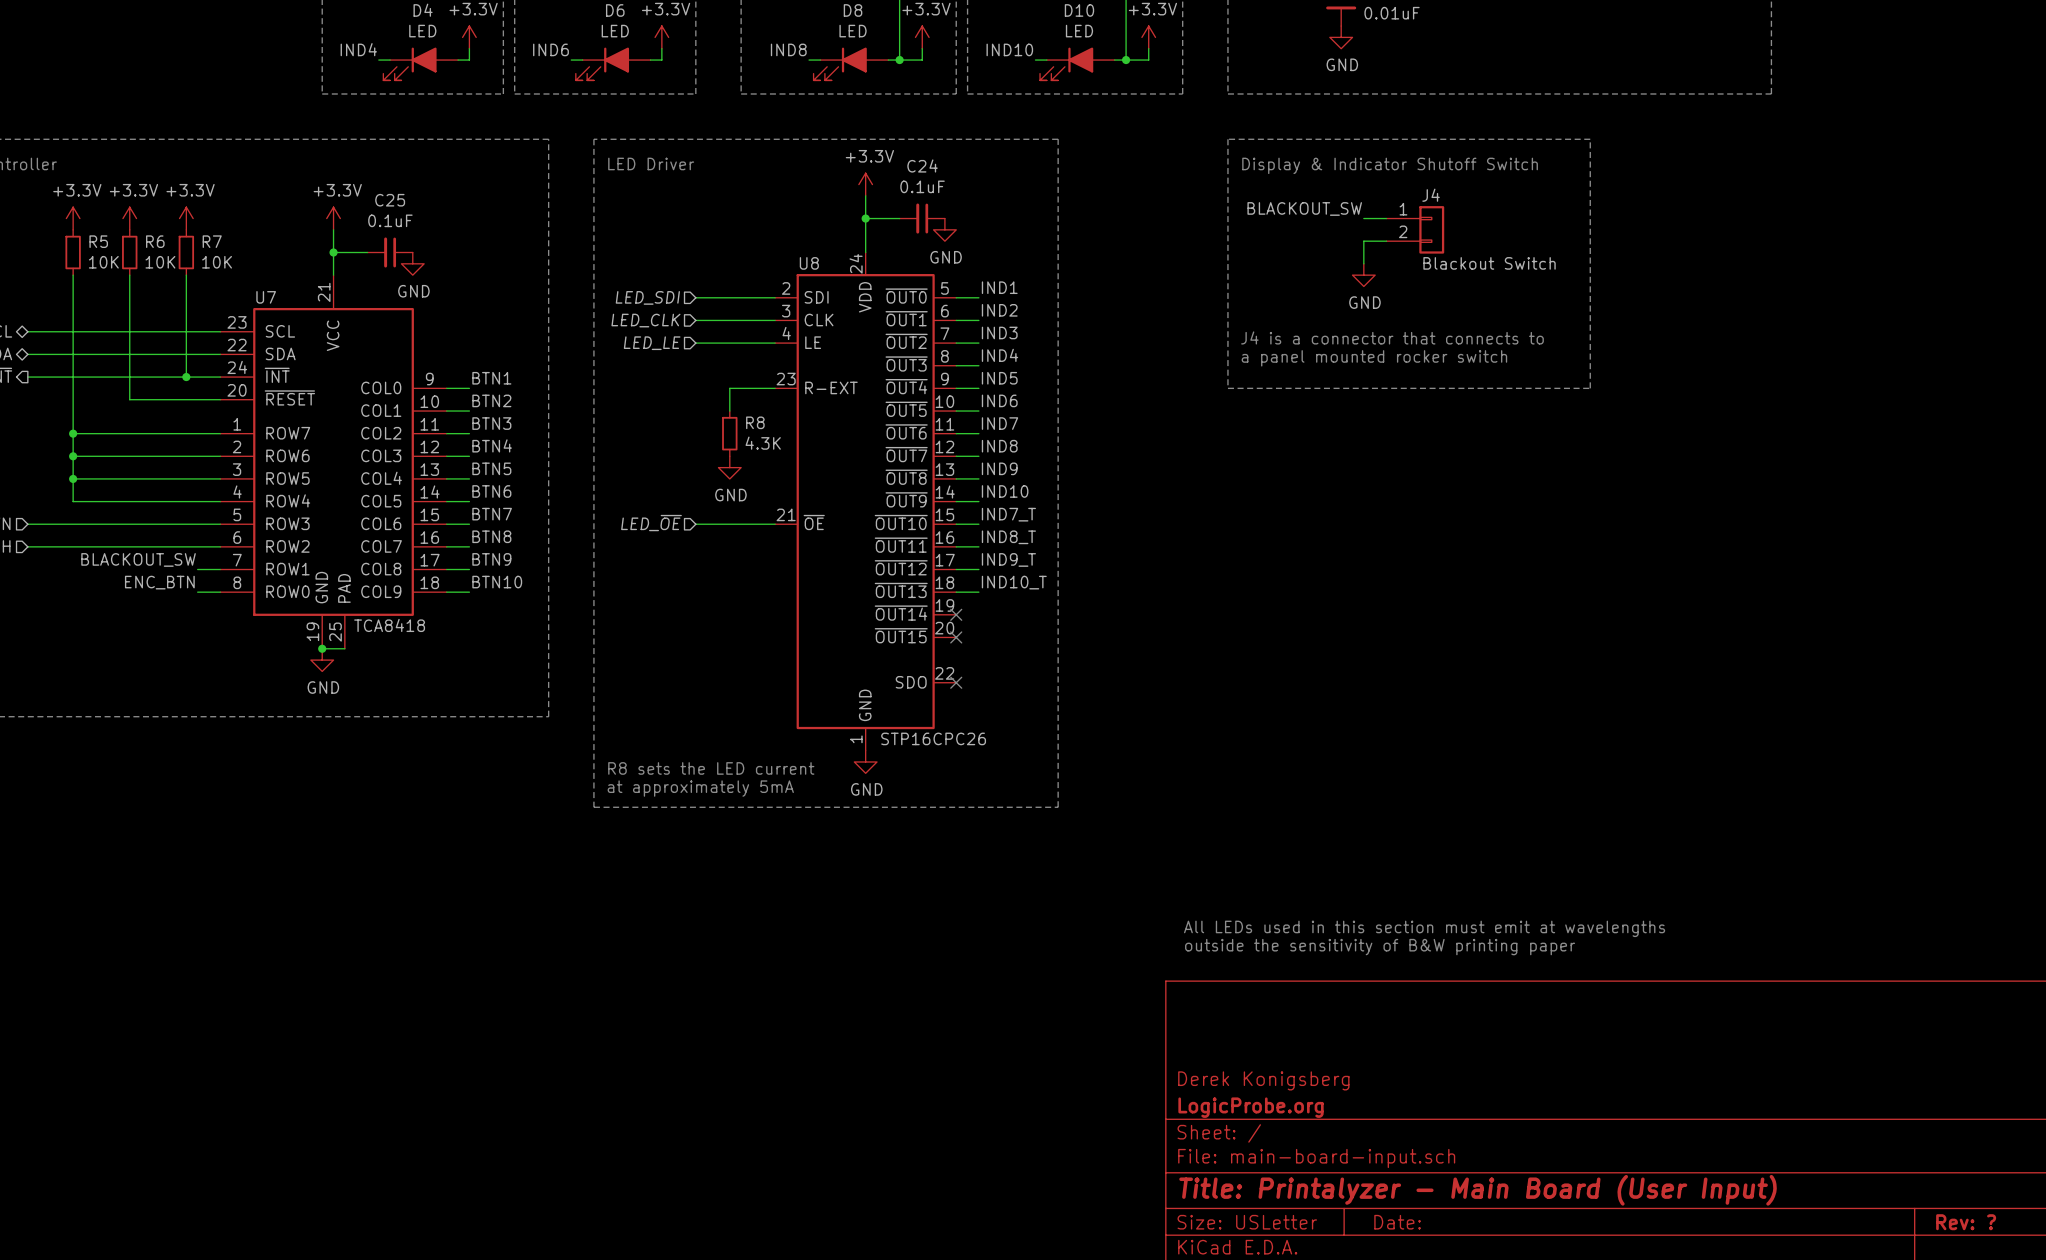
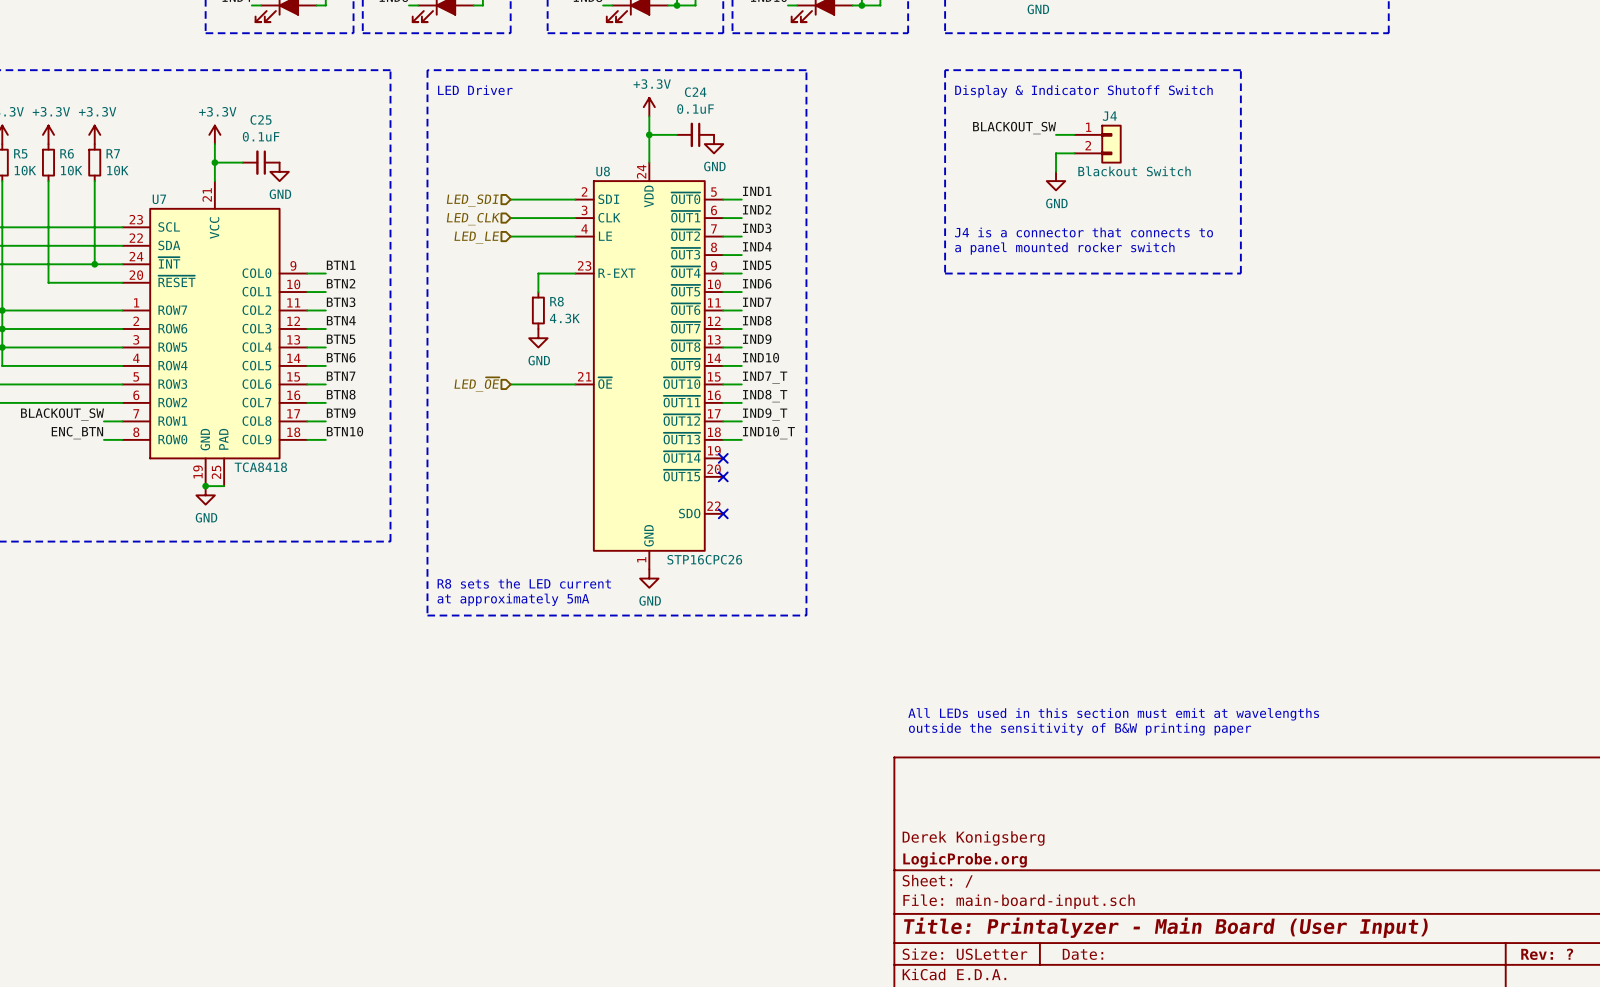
J4 text: none -> Blackout Switch (1134, 171)
J4 value: Blackout Switch (1489, 263) -> none

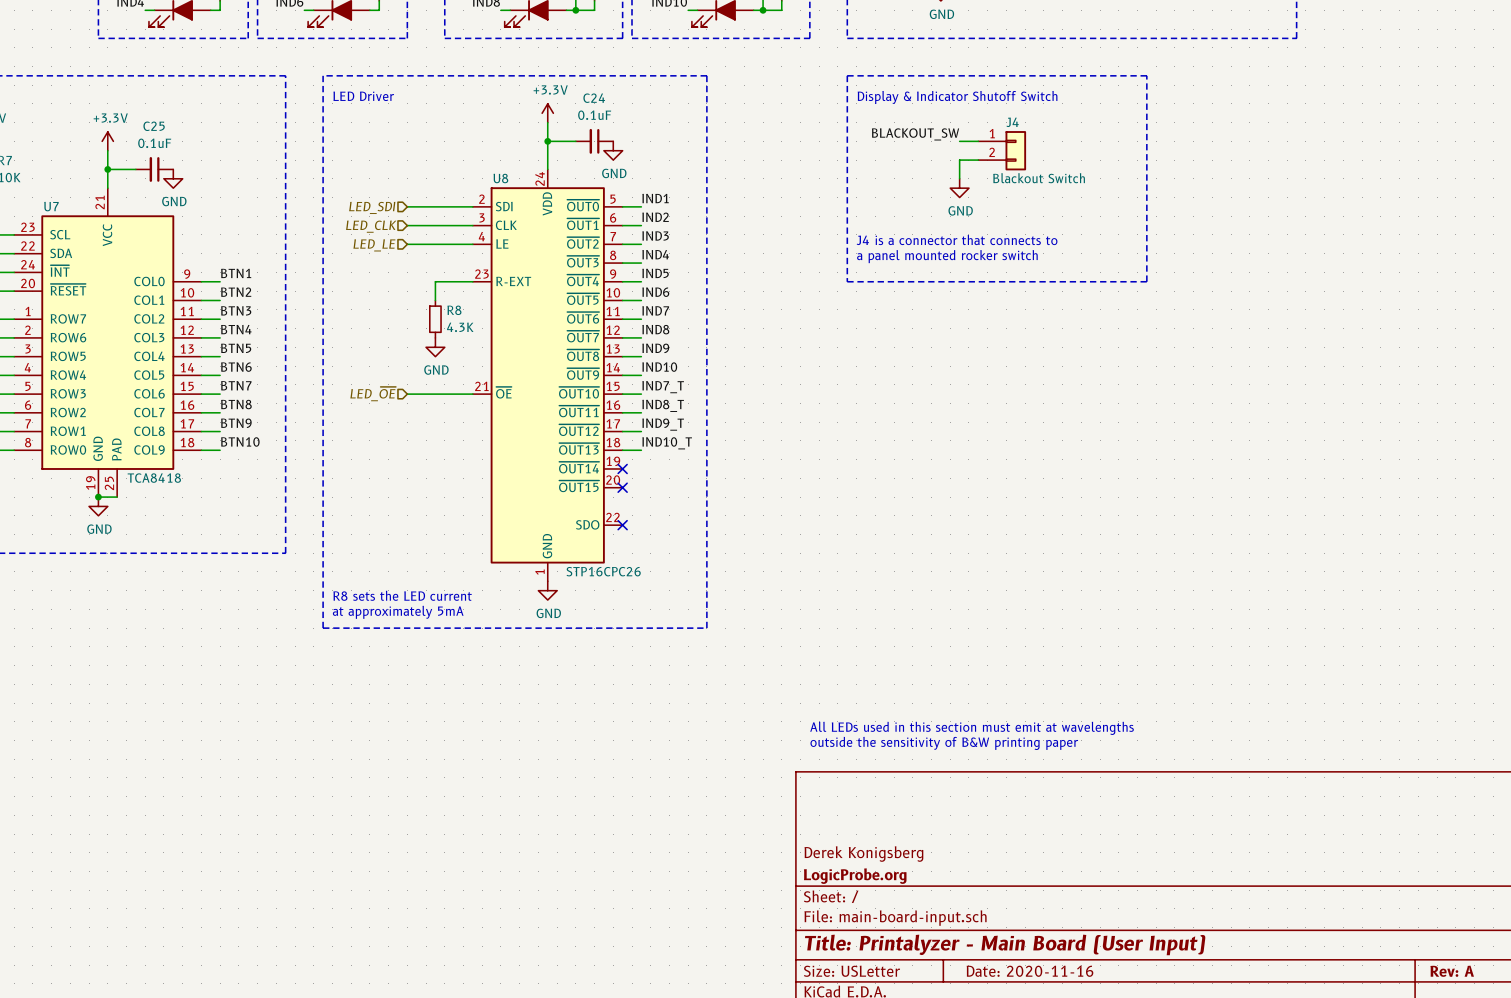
title block: Date: (1083, 954) -> Date: 2020-11-16 (1029, 971)
title block: Rev: ? (1547, 954) -> Rev: A (1452, 971)

